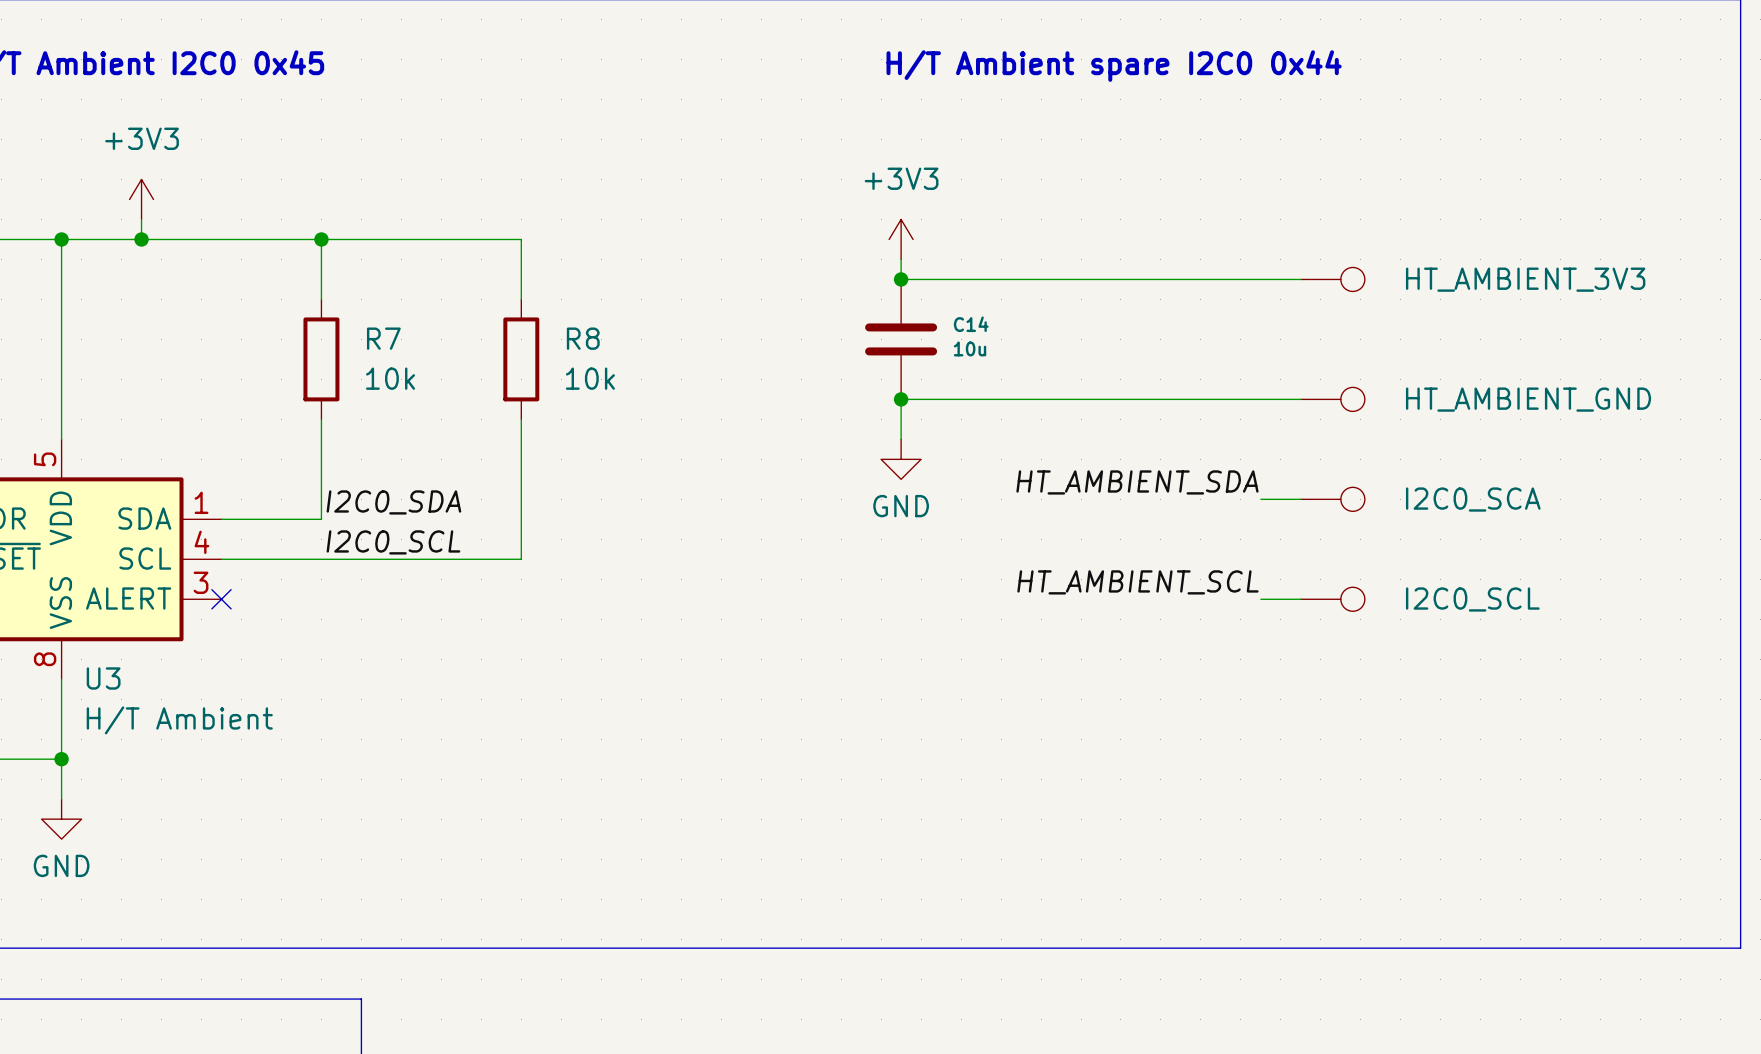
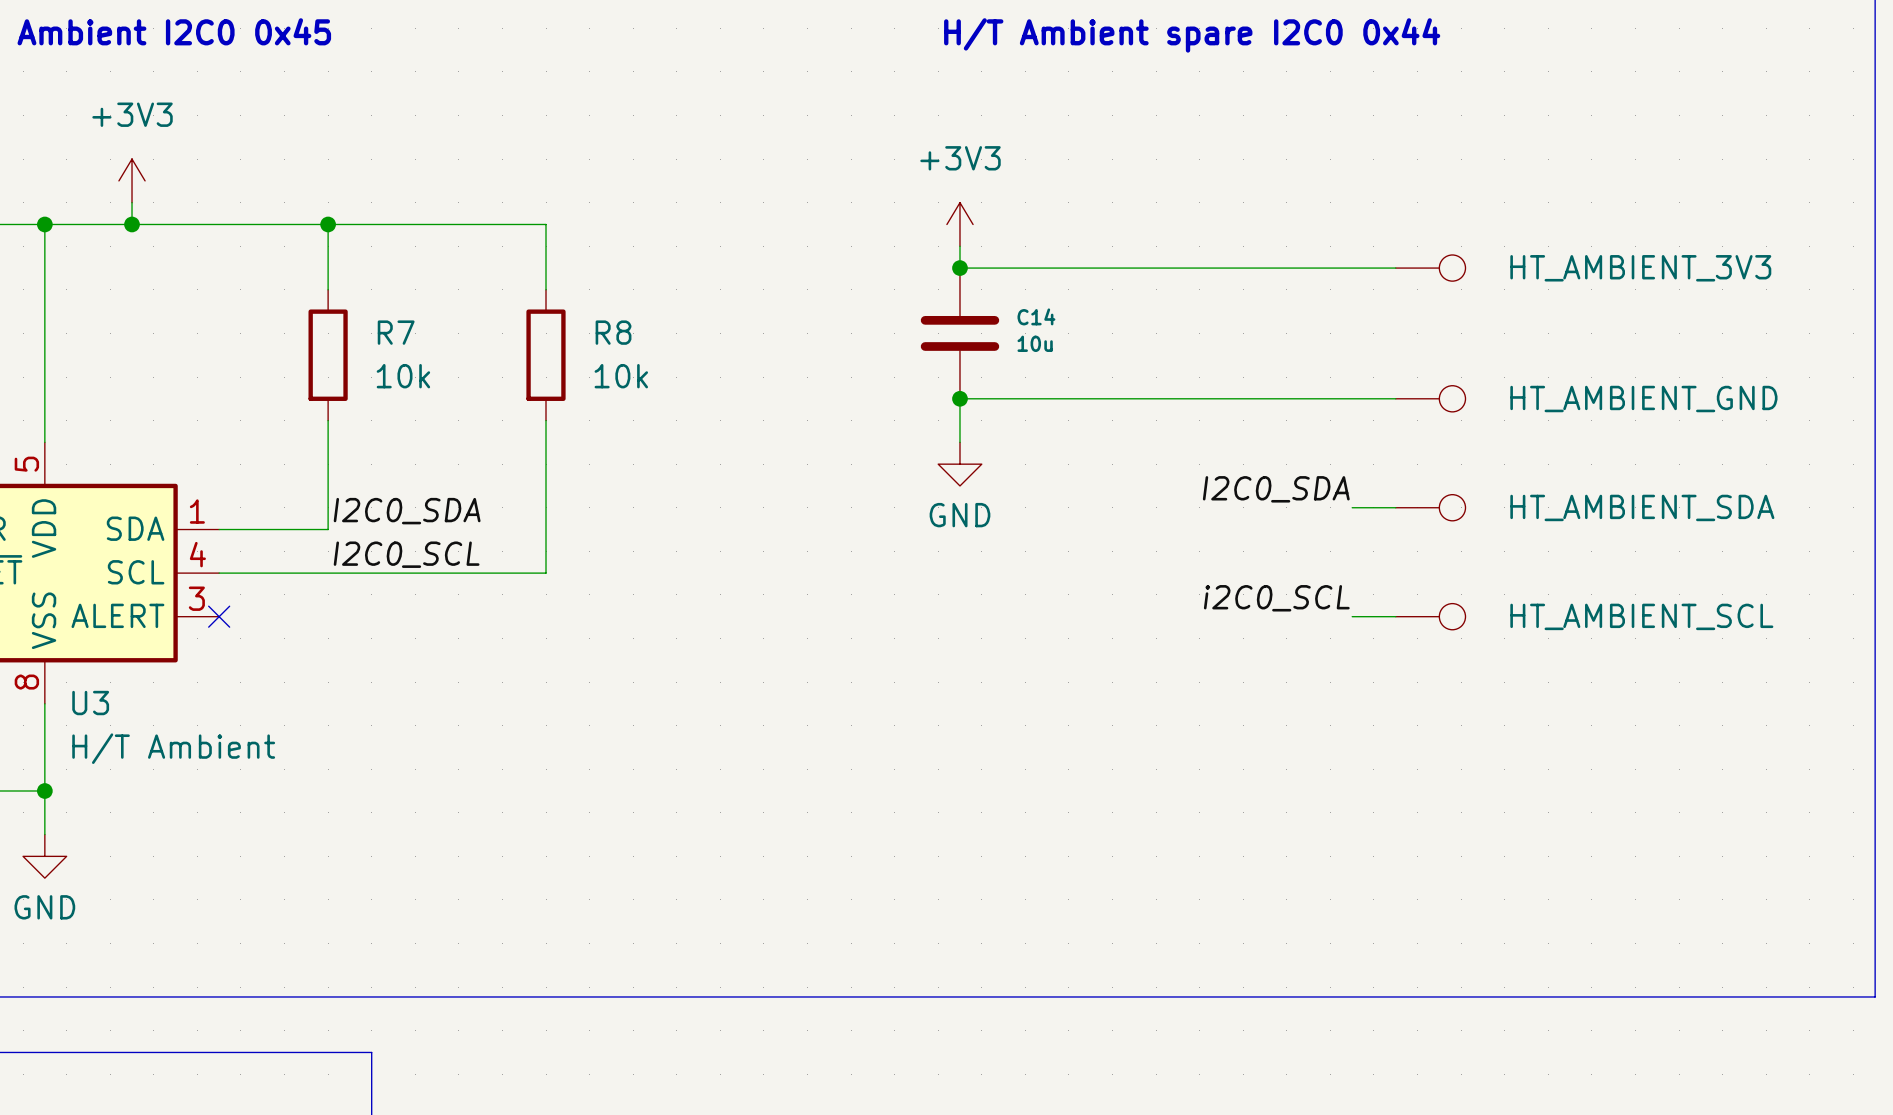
label: HT_AMBIENT_SDA (1137, 482) -> I2C0_SDA (1276, 489)
part value: I2C0_SCA (1473, 499) -> HT_AMBIENT_SDA (1642, 507)
label: HT_AMBIENT_SCL (1137, 582) -> i2C0_SCL (1276, 598)
part value: I2C0_SCL (1472, 599) -> HT_AMBIENT_SCL (1641, 616)

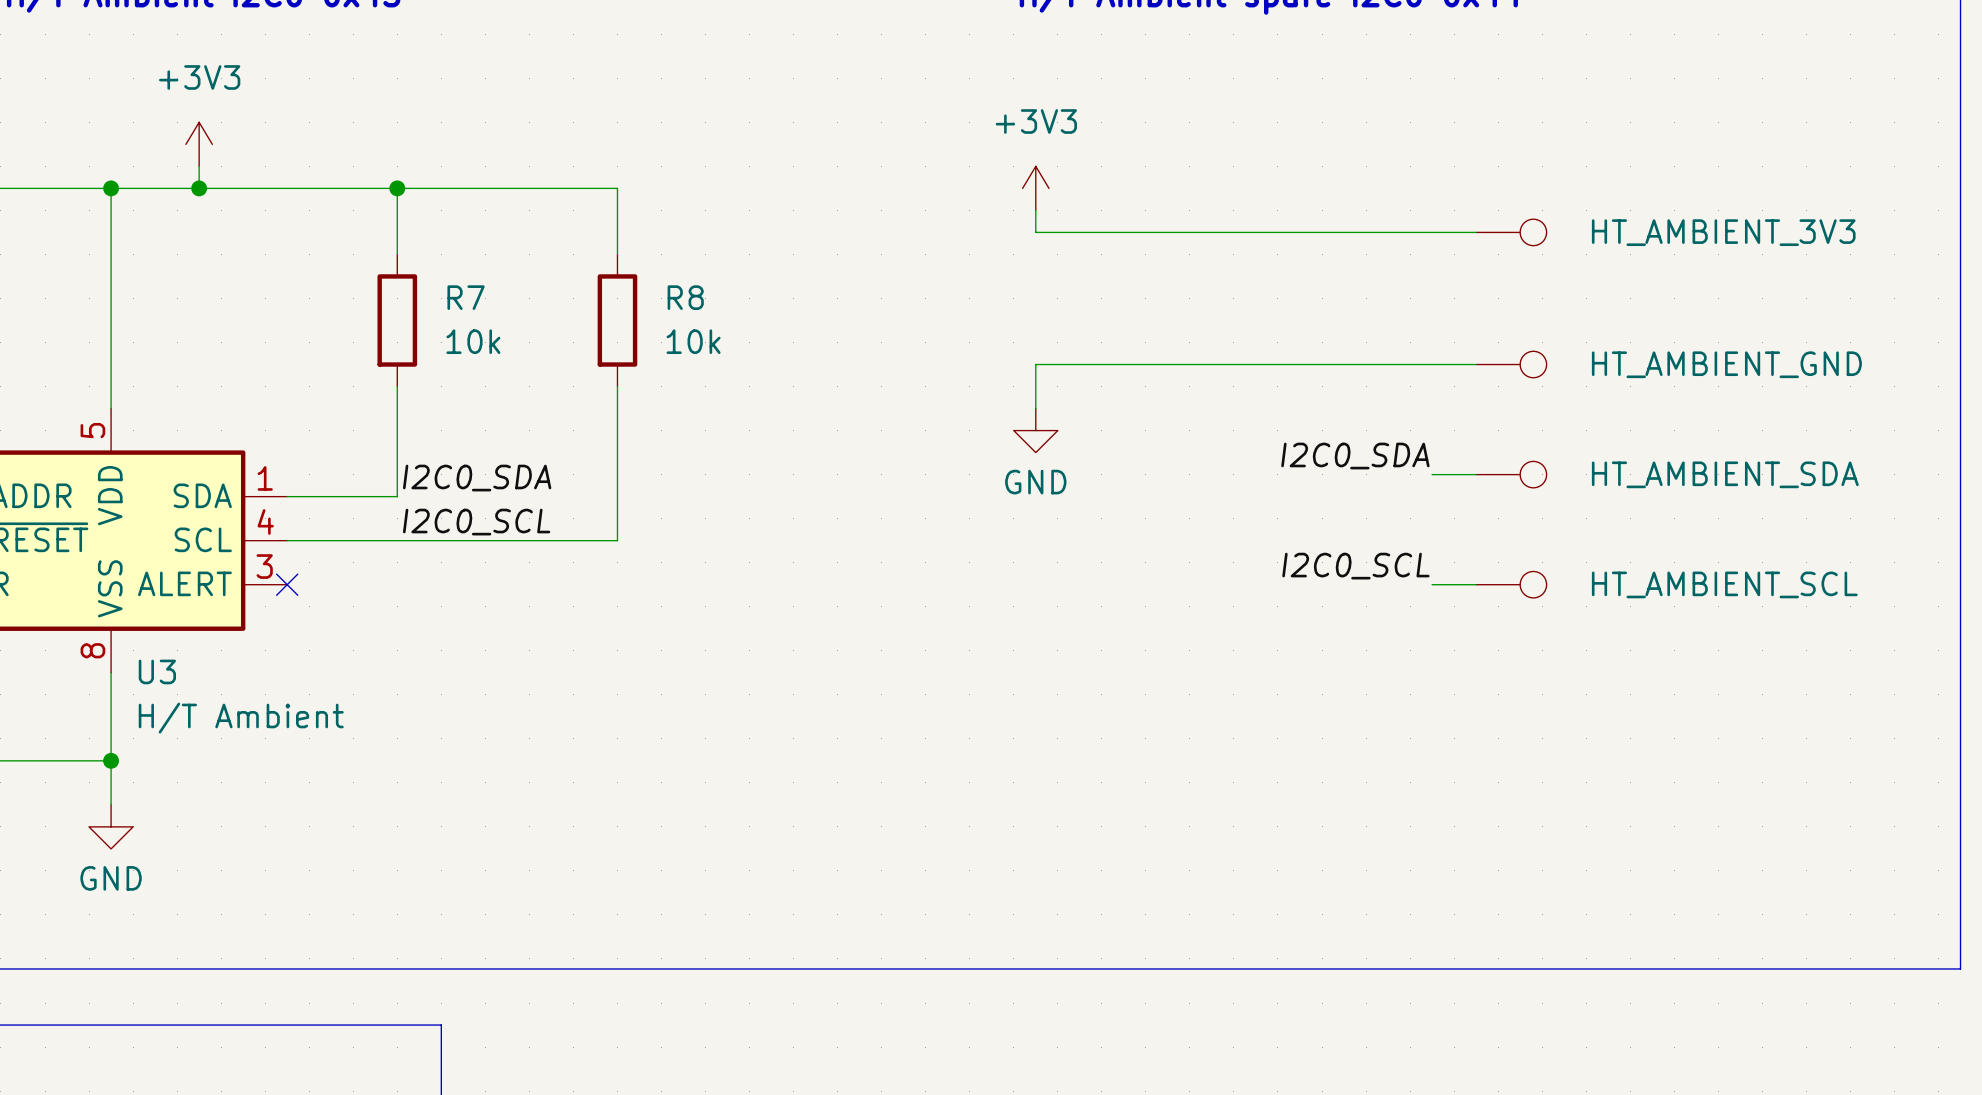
junction: (959, 268) -> none
C14: 10u (959, 333) -> none
junction: (959, 398) -> none
label: i2C0_SCL (1276, 598) -> I2C0_SCL (1355, 566)

